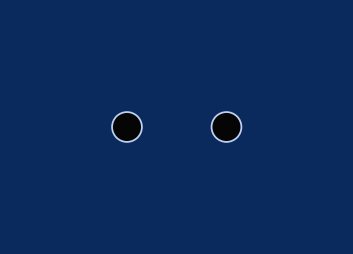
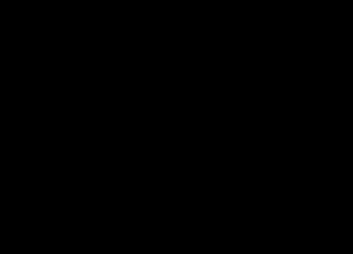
part: (176, 126) -> none

